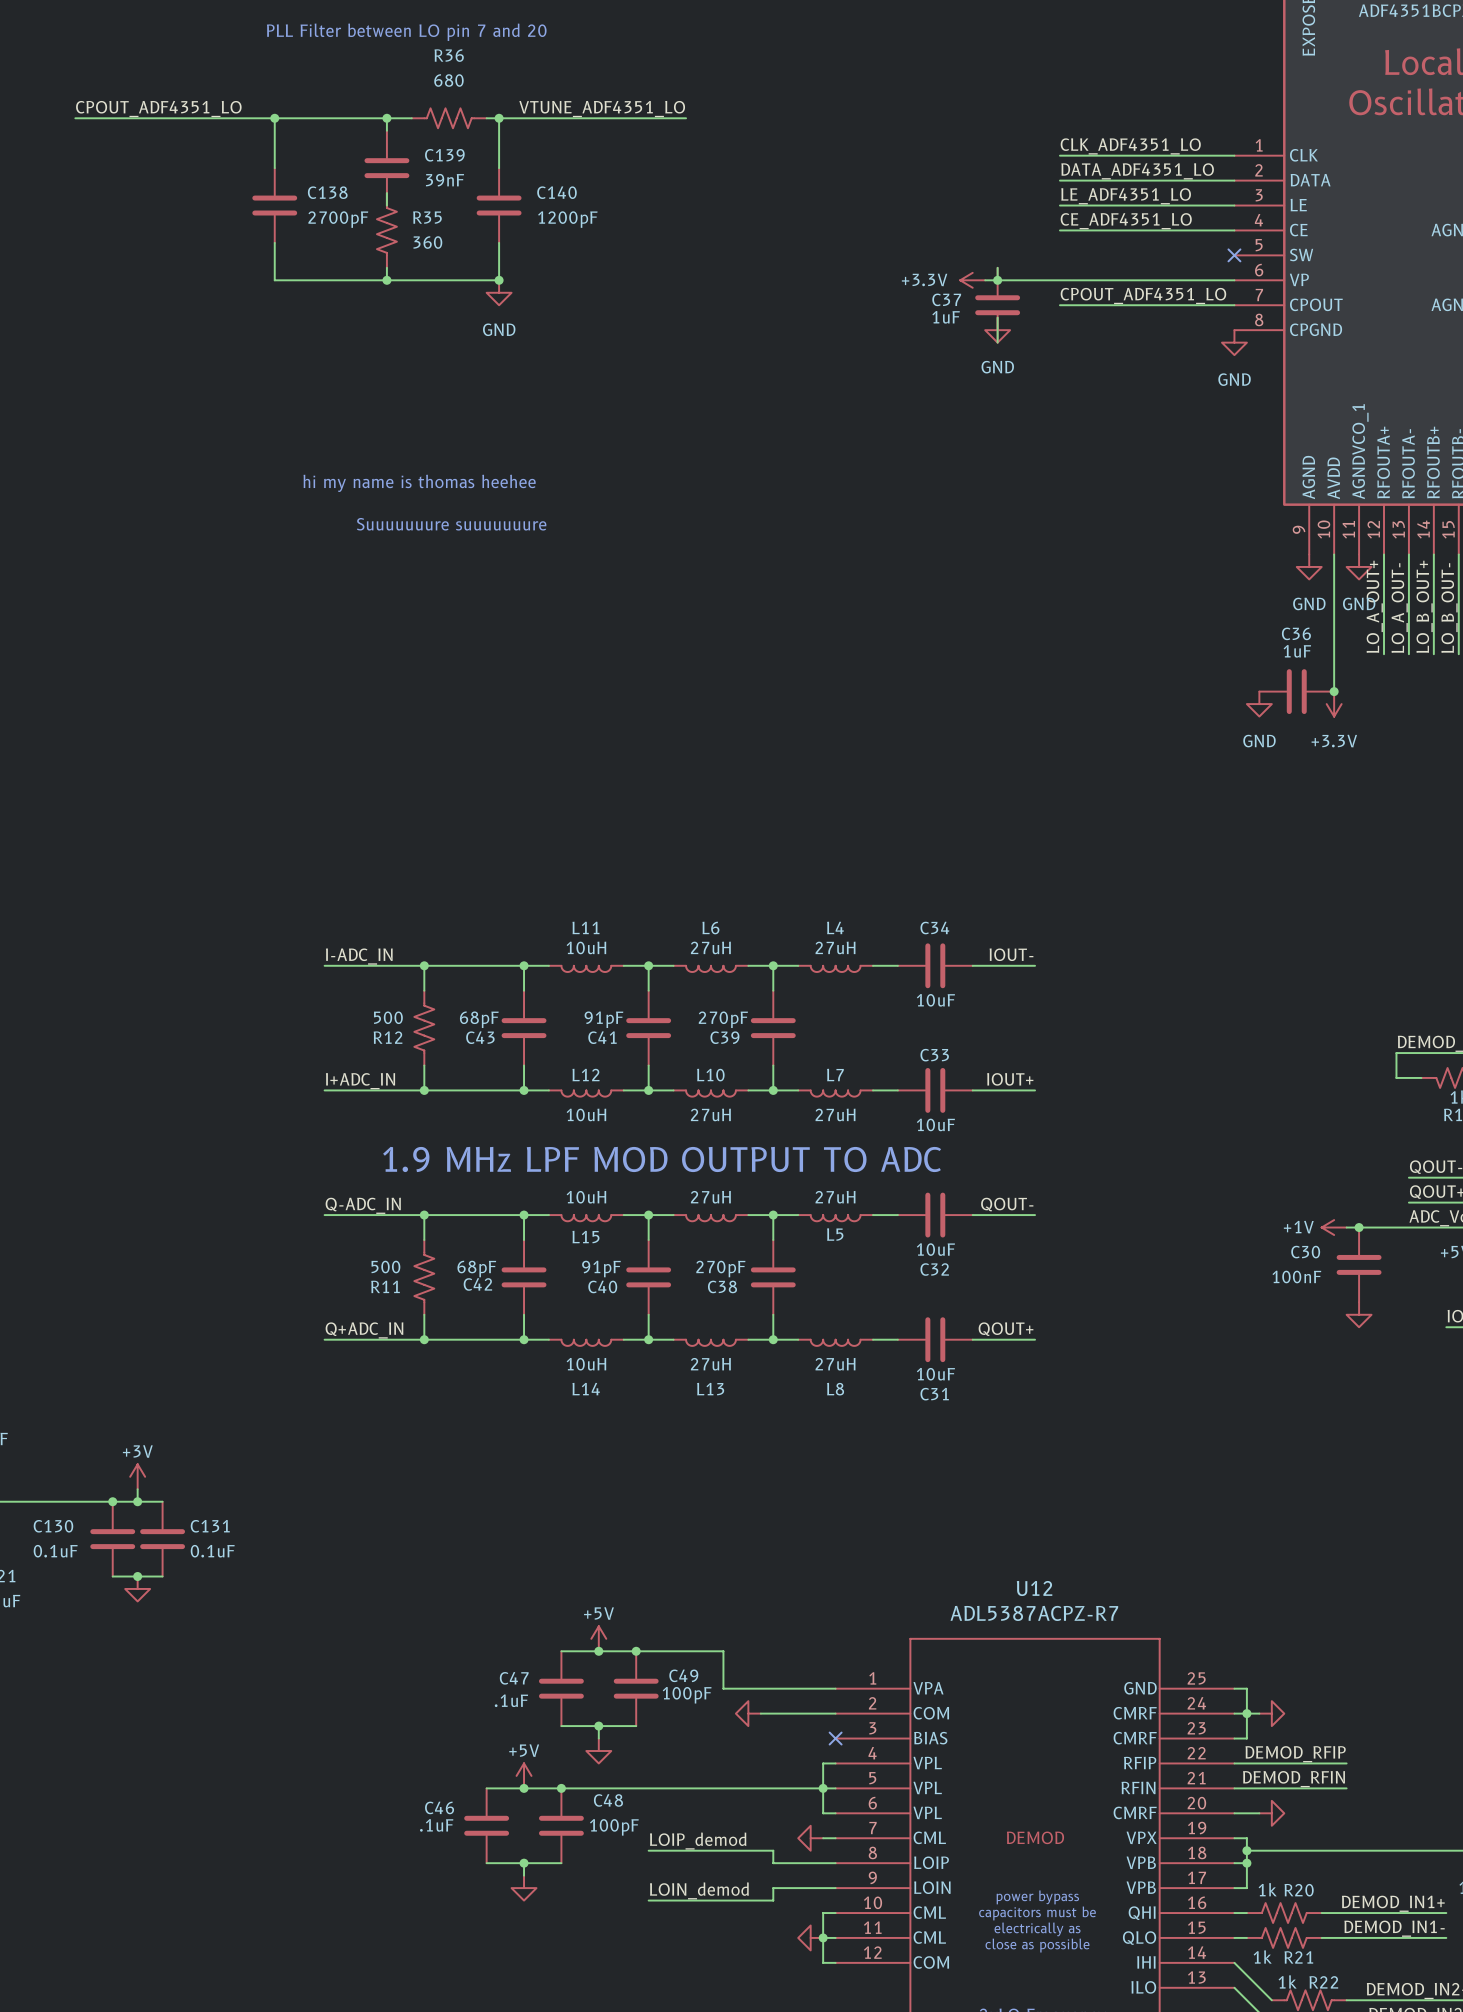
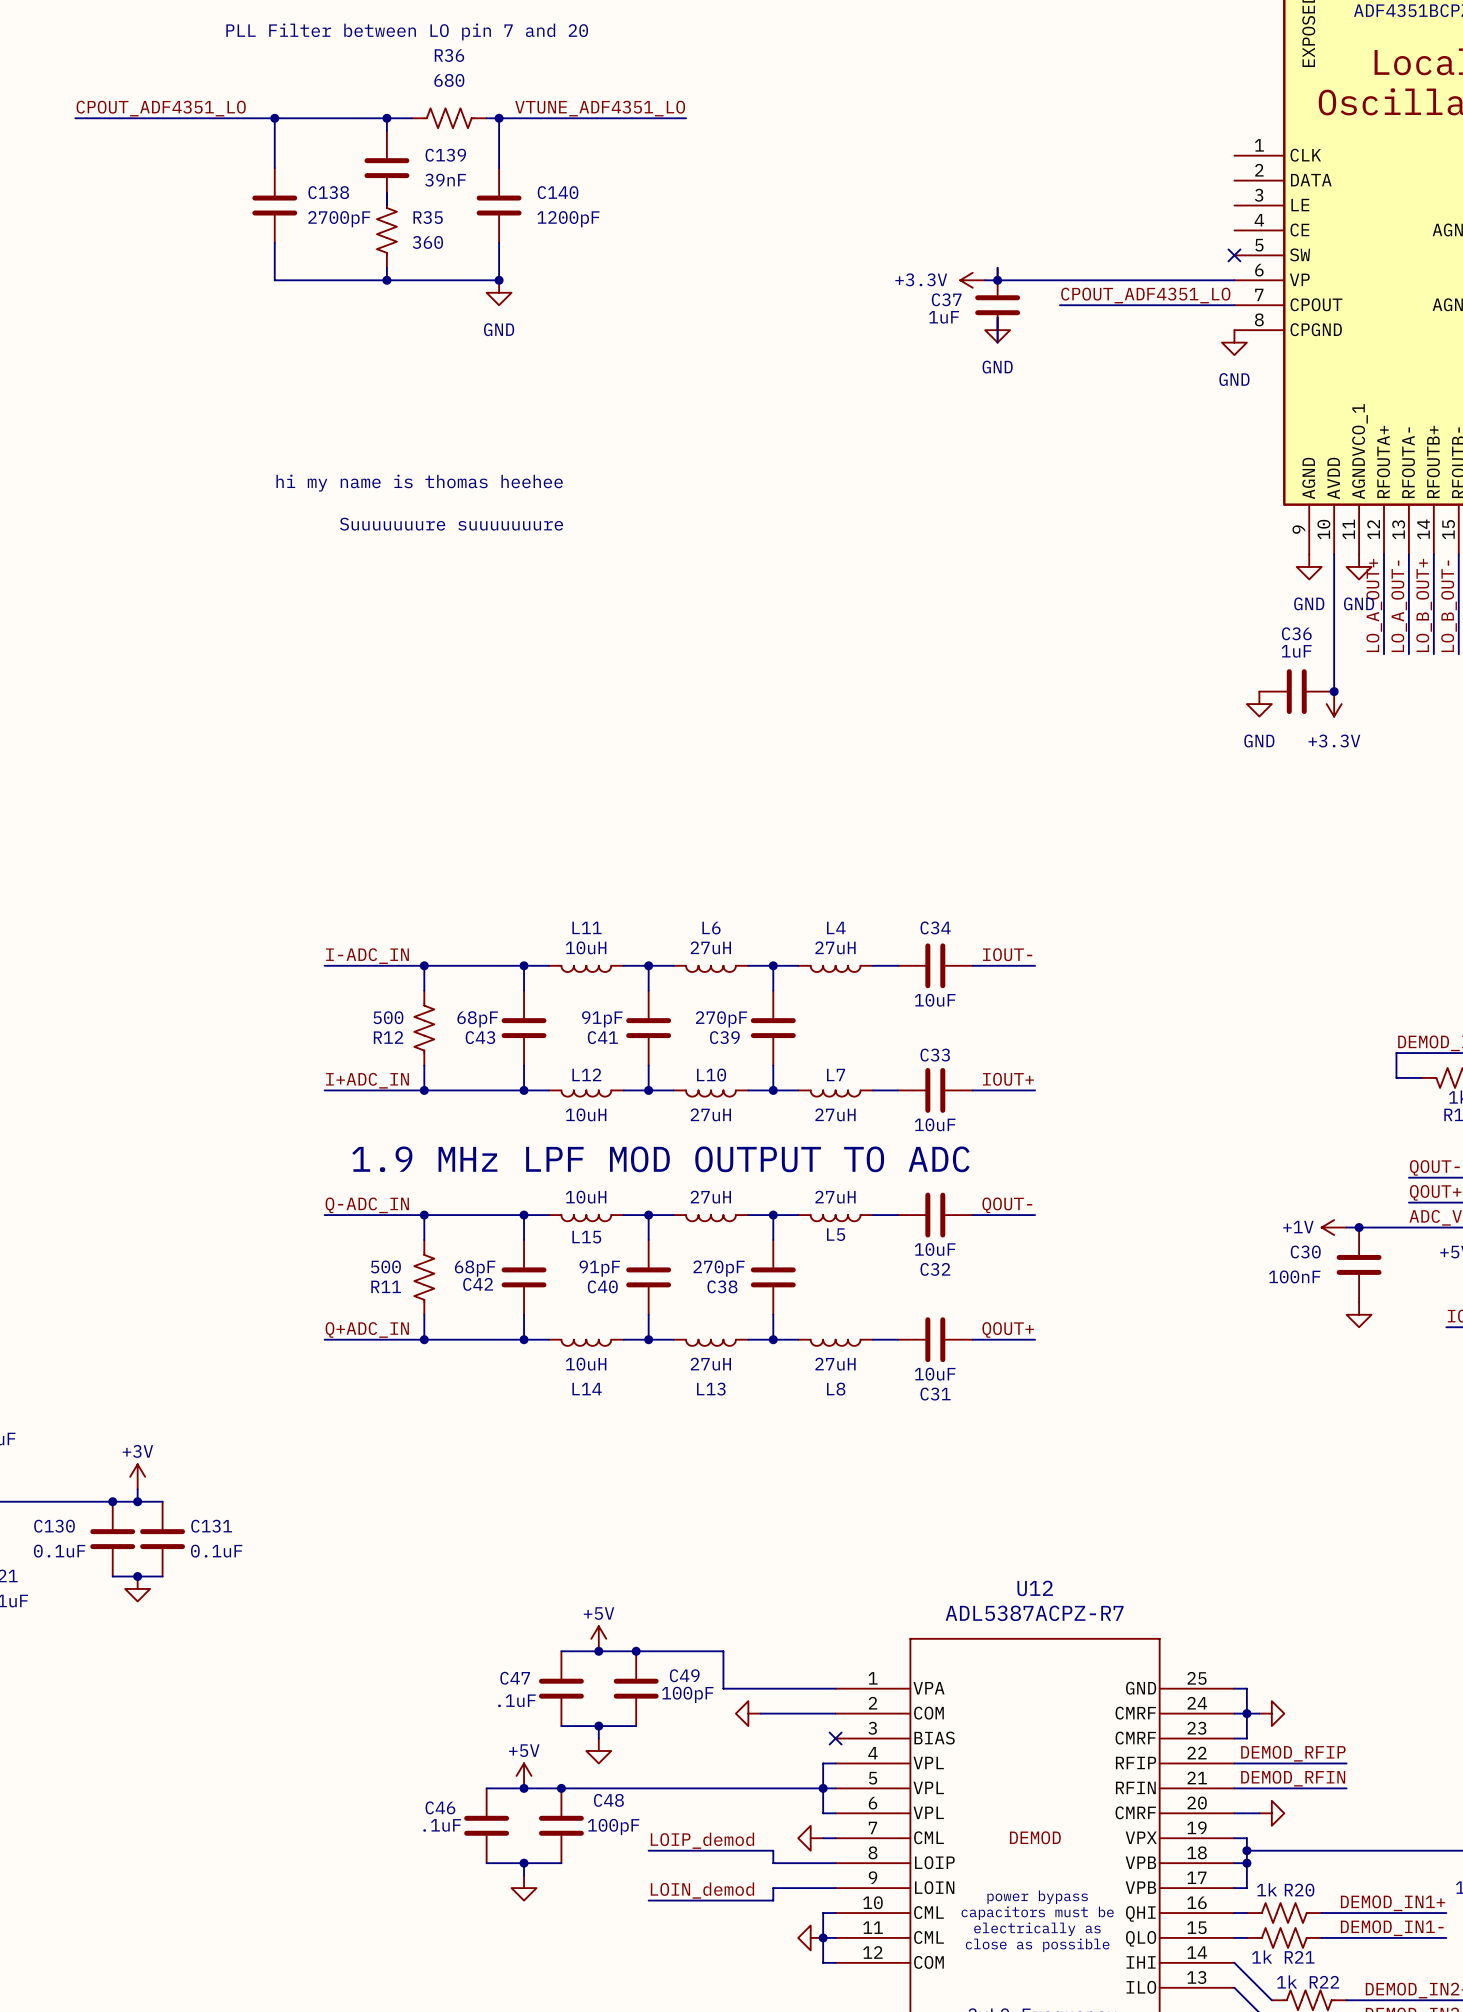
label: CLK_ADF4351_LO (1130, 146) -> none
wire: (1059, 155) (1234, 155) -> none
label: DATA_ADF4351_LO (1137, 171) -> none
wire: (1059, 180) (1234, 180) -> none
label: LE_ADF4351_LO (1126, 196) -> none
wire: (1059, 205) (1234, 205) -> none
label: CE_ADF4351_LO (1126, 221) -> none
wire: (1059, 230) (1234, 230) -> none

